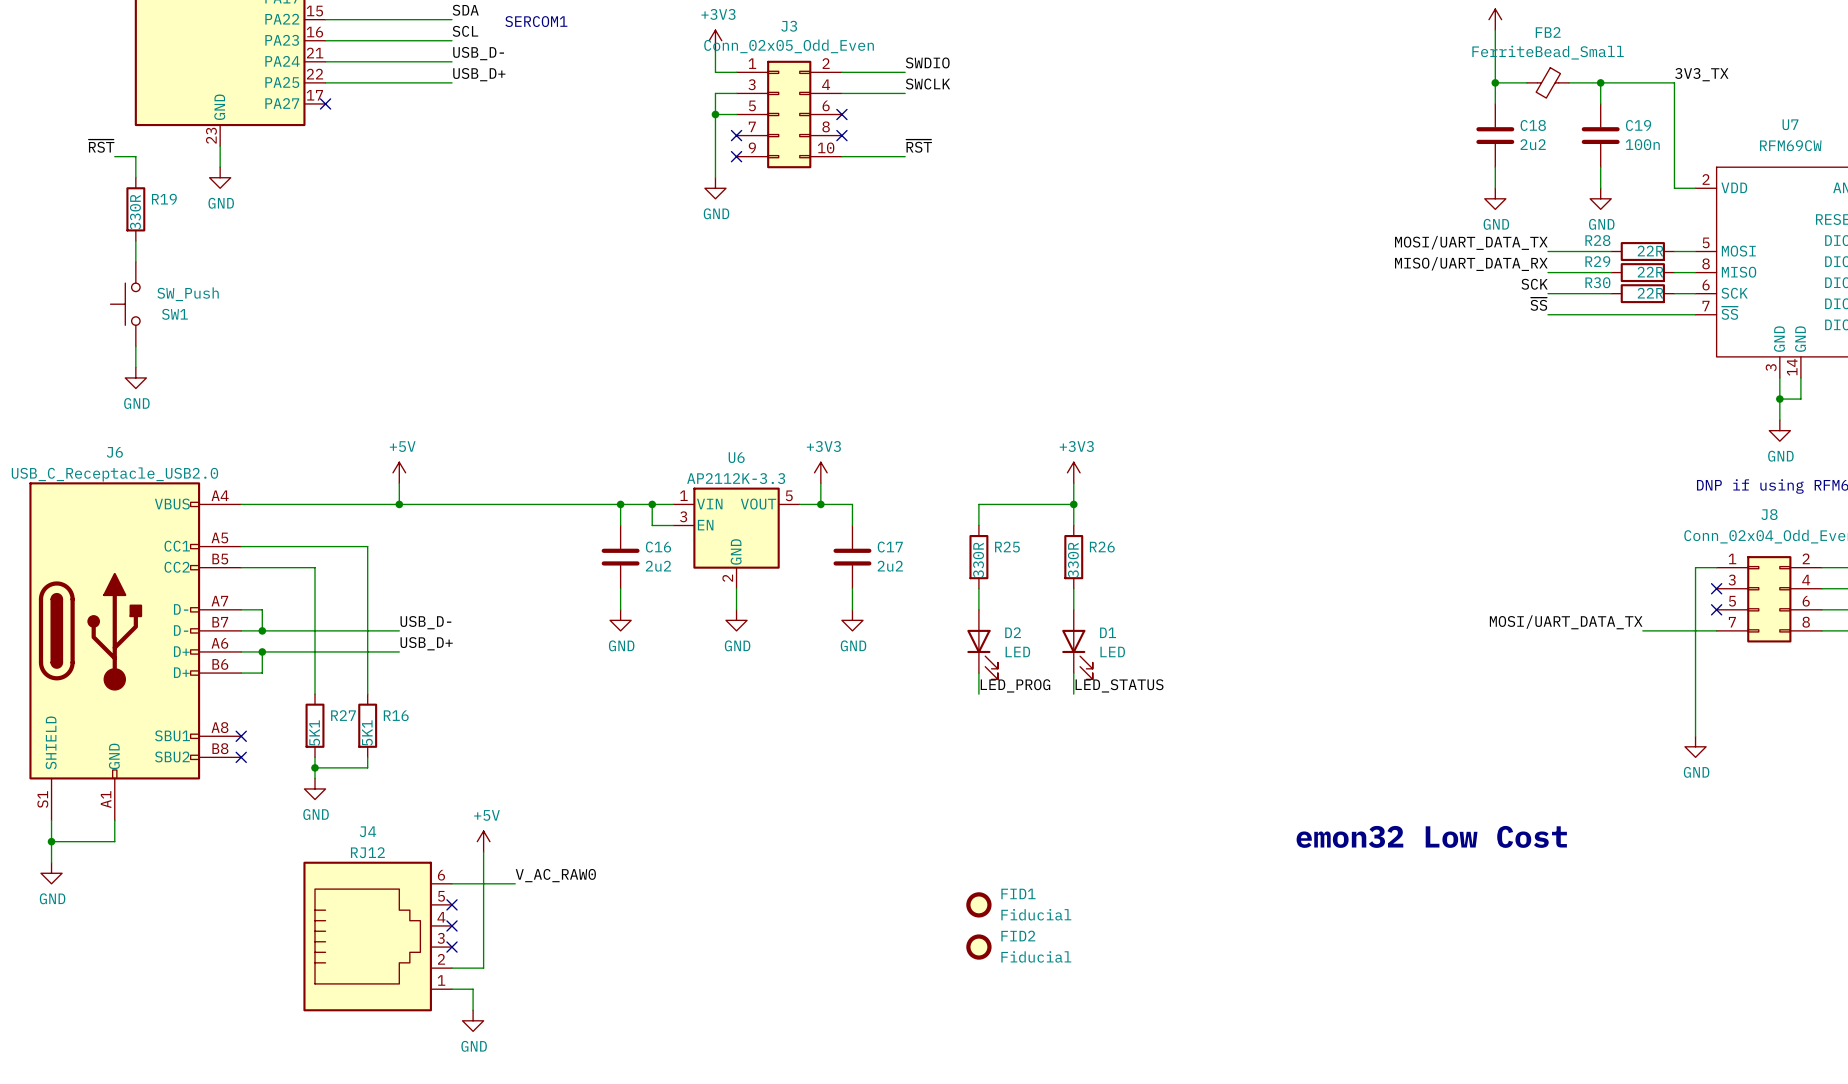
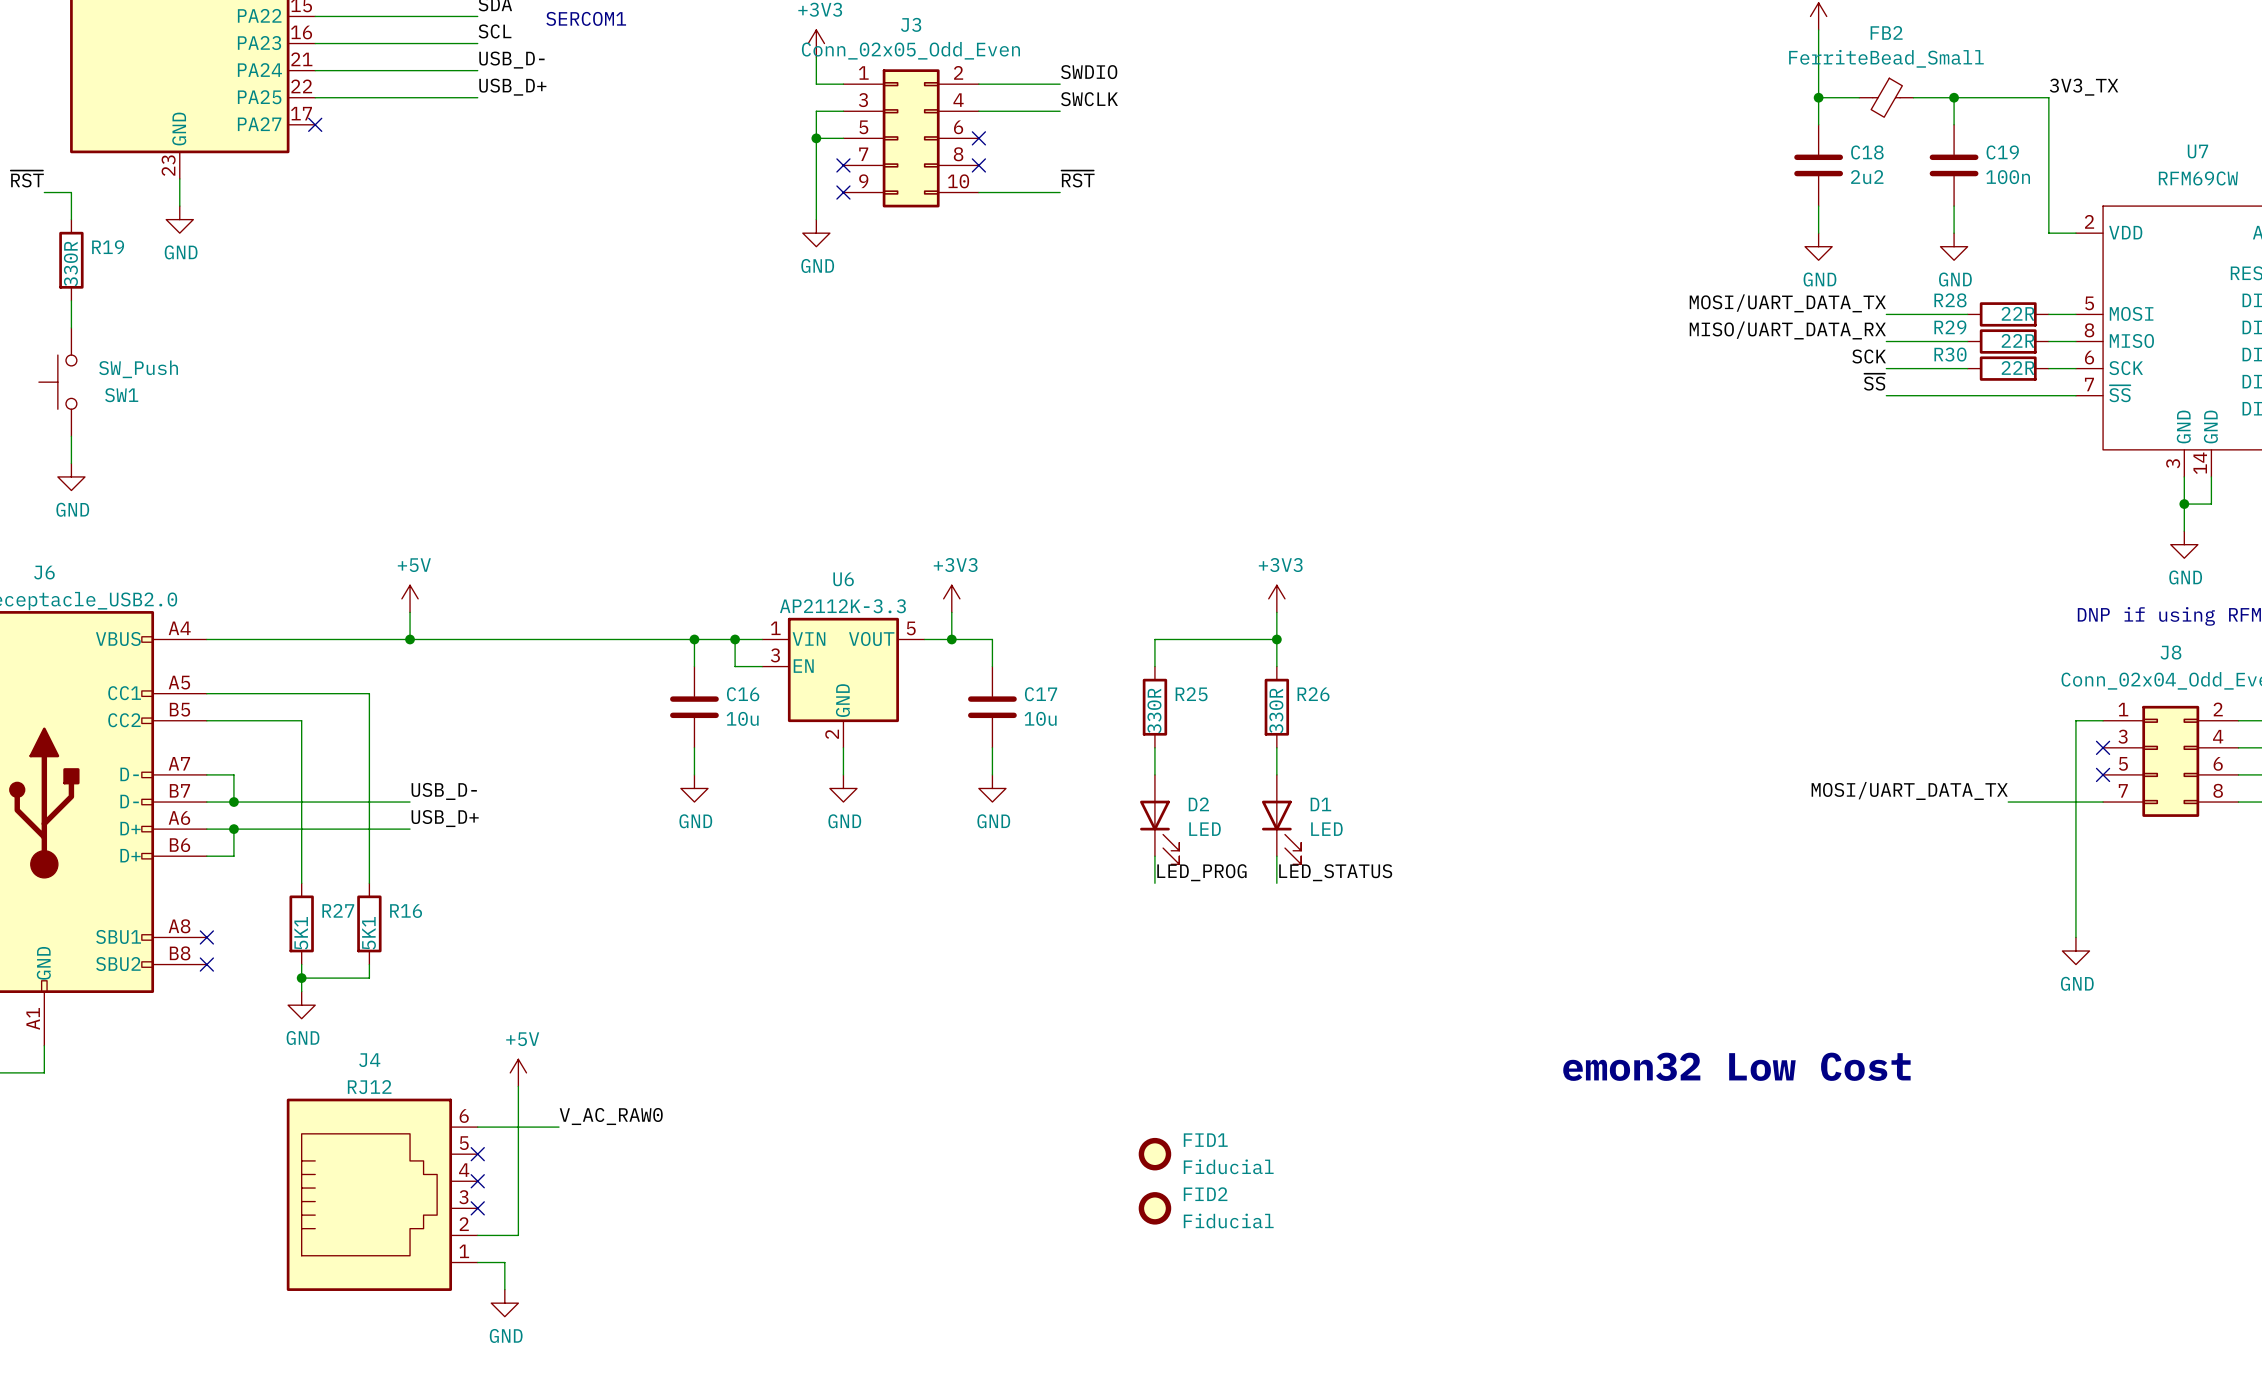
C16 value: 2u2 (658, 566) -> 10u (742, 718)
C17 value: 2u2 (890, 566) -> 10u (1040, 718)

